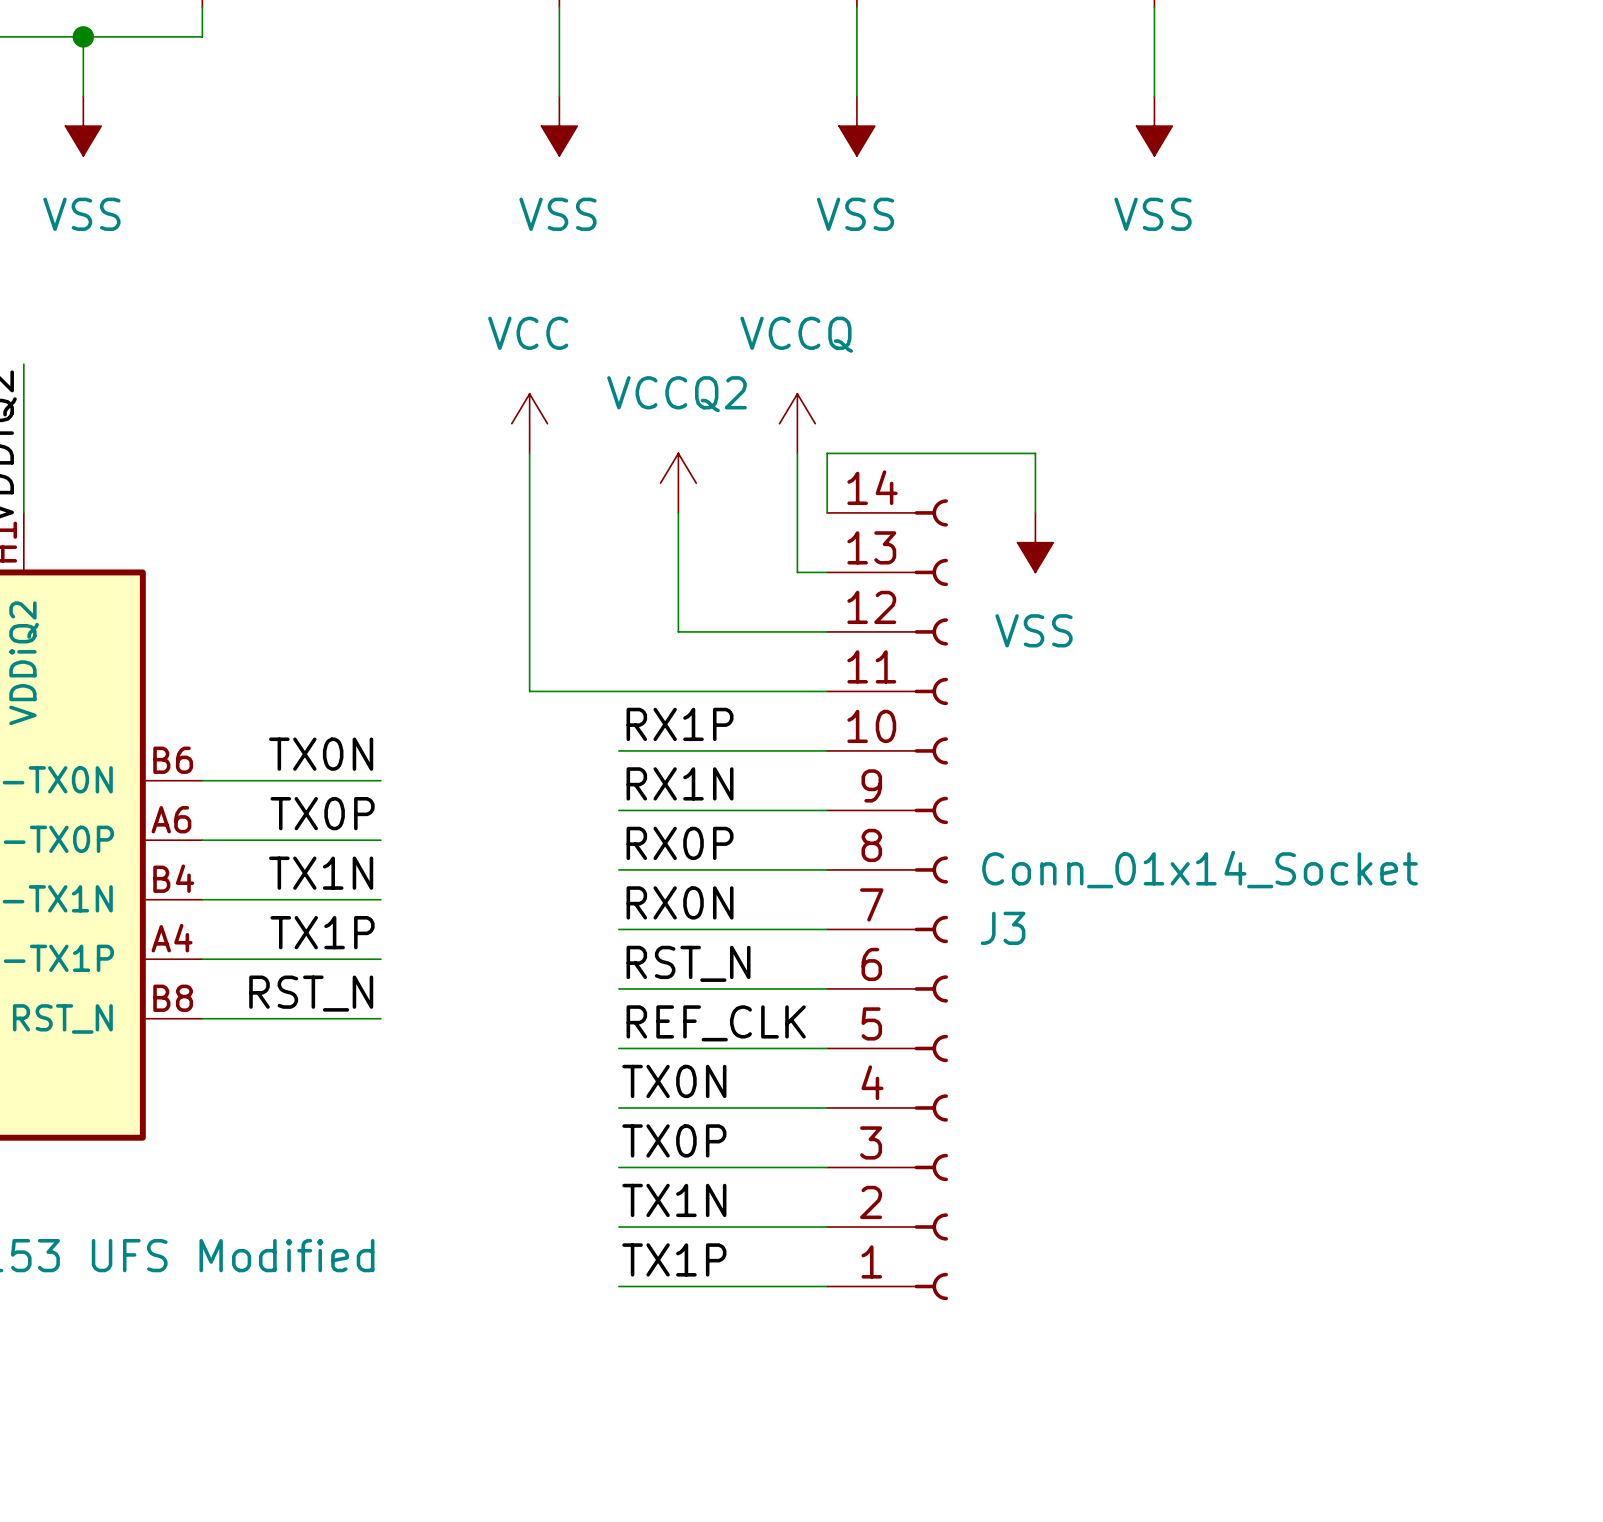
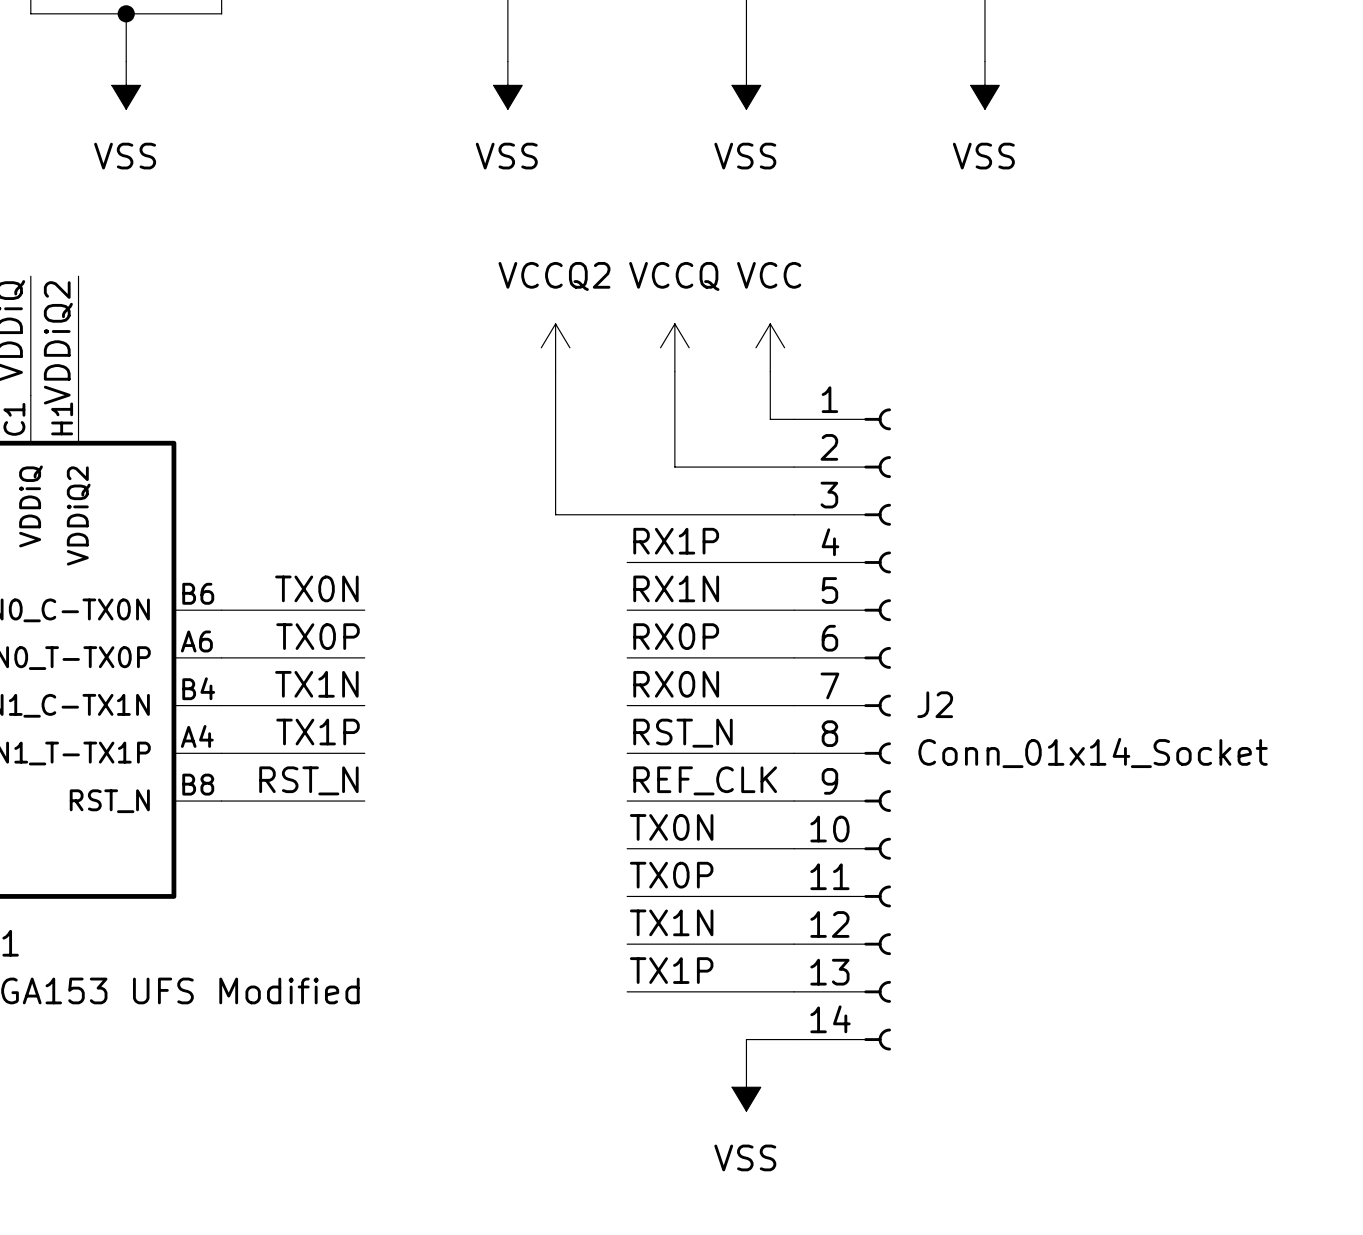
power symbol position: VCC (529, 423) -> VCC (770, 347)
power symbol position: VCCQ (797, 423) -> VCCQ (674, 347)
wire: (529, 453) (529, 691) (827, 691) -> none
wire: (797, 453) (797, 572) (827, 572) -> none
wire: none -> (555, 371) (555, 514) (794, 514)
power symbol position: VCCQ2 (678, 483) -> VCCQ2 (555, 347)
wire: none -> (770, 371) (770, 419) (794, 419)
wire: (678, 512) (678, 631) (827, 631) -> (674, 371) (674, 467) (794, 467)
wire: (827, 512) (827, 453) (1035, 453) (1035, 512) -> none
power symbol: VSS (1035, 542) -> none
label position: RX1P (680, 724) -> RX1P (676, 541)
wire: (618, 750) (827, 750) -> (627, 562) (794, 562)
label position: RX1N (680, 783) -> RX1N (676, 588)
wire: (618, 810) (827, 810) -> (627, 610) (794, 610)
label position: RX0P (680, 843) -> RX0P (676, 636)
wire: (618, 869) (827, 869) -> (627, 657) (794, 657)
J3: Conn_01x14_Socket (887, 899) -> none
label position: RX0N (680, 902) -> RX0N (676, 684)
wire: (618, 929) (827, 929) -> (627, 705) (794, 705)
J2: none -> Conn_01x14_Socket (842, 729)
label position: RST_N (688, 963) -> RST_N (683, 733)
wire: (618, 988) (827, 988) -> (627, 753) (794, 753)
label position: REF_CLK (716, 1023) -> REF_CLK (705, 780)
wire: (618, 1048) (827, 1048) -> (627, 801) (794, 801)
label position: TX0N (674, 1081) -> TX0N (671, 827)
wire: (618, 1107) (827, 1107) -> (627, 848) (794, 848)
label position: TX0P (674, 1140) -> TX0P (671, 875)
wire: (618, 1167) (827, 1167) -> (627, 896) (794, 896)
label position: TX1N (674, 1200) -> TX1N (671, 922)
wire: (618, 1226) (827, 1226) -> (627, 944) (794, 944)
label position: TX1P (674, 1259) -> TX1P (671, 970)
wire: (618, 1286) (827, 1286) -> (627, 991) (794, 991)
wire: none -> (794, 1039) (746, 1039) (746, 1063)
power symbol: none -> VSS (746, 1087)

